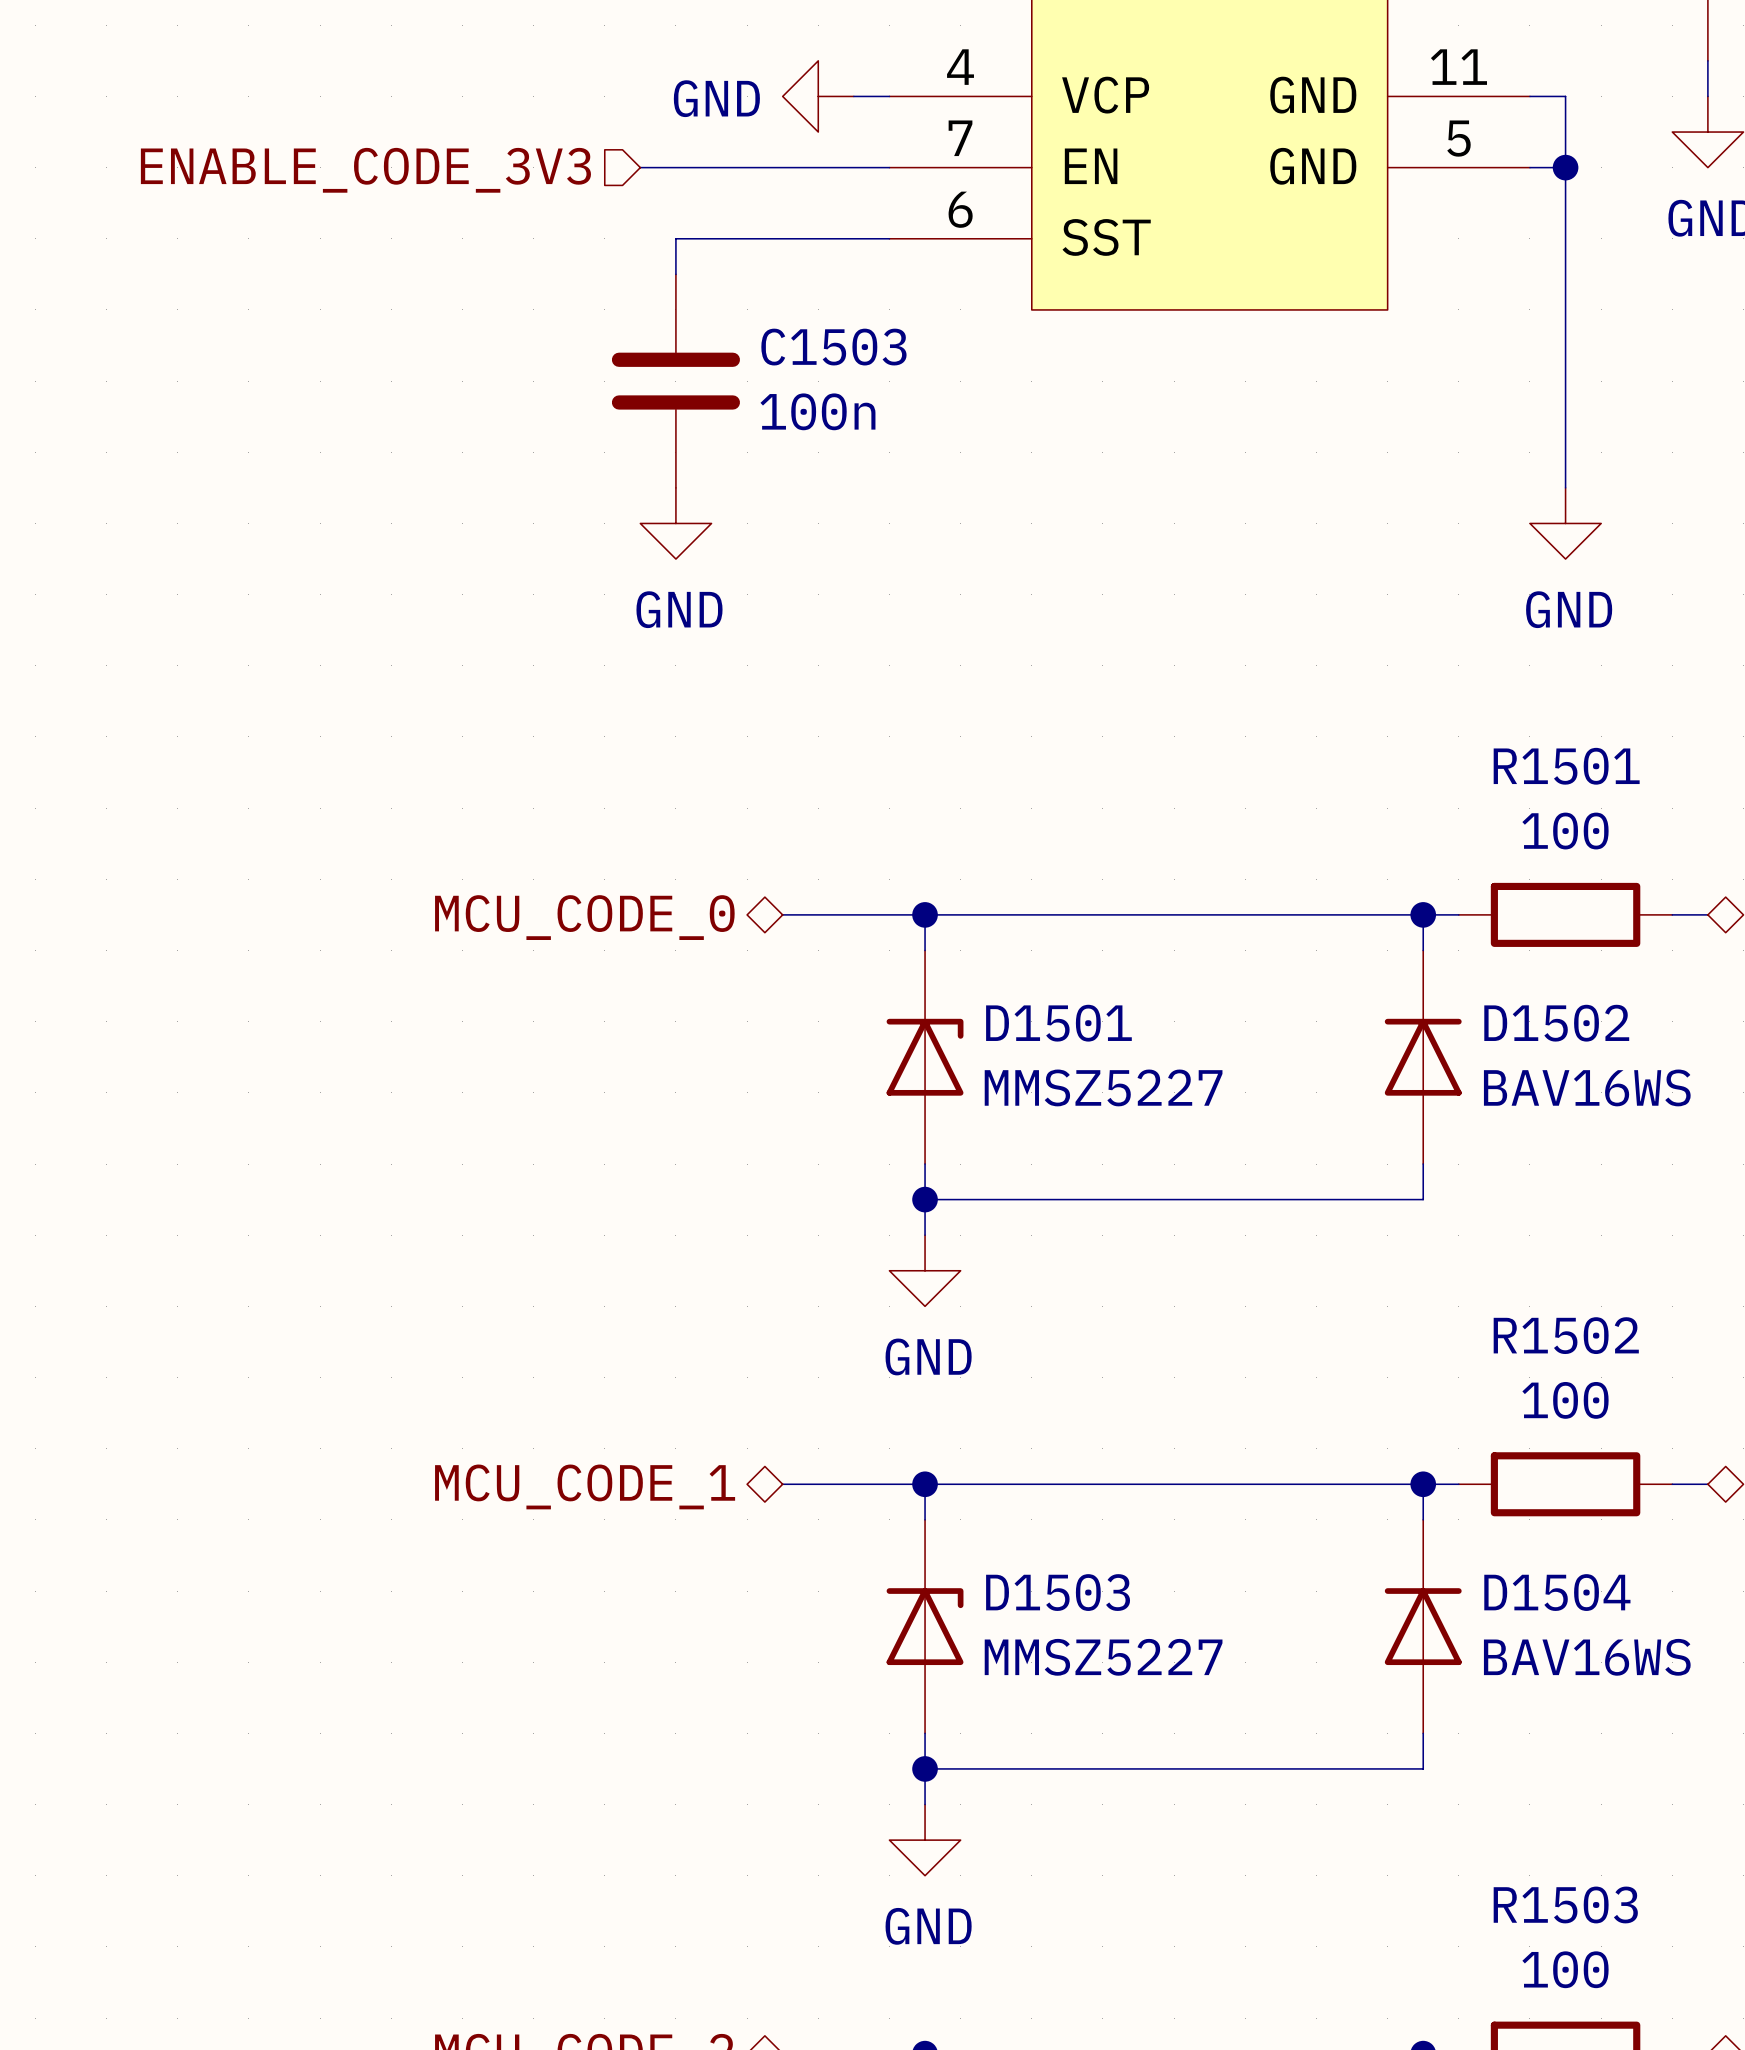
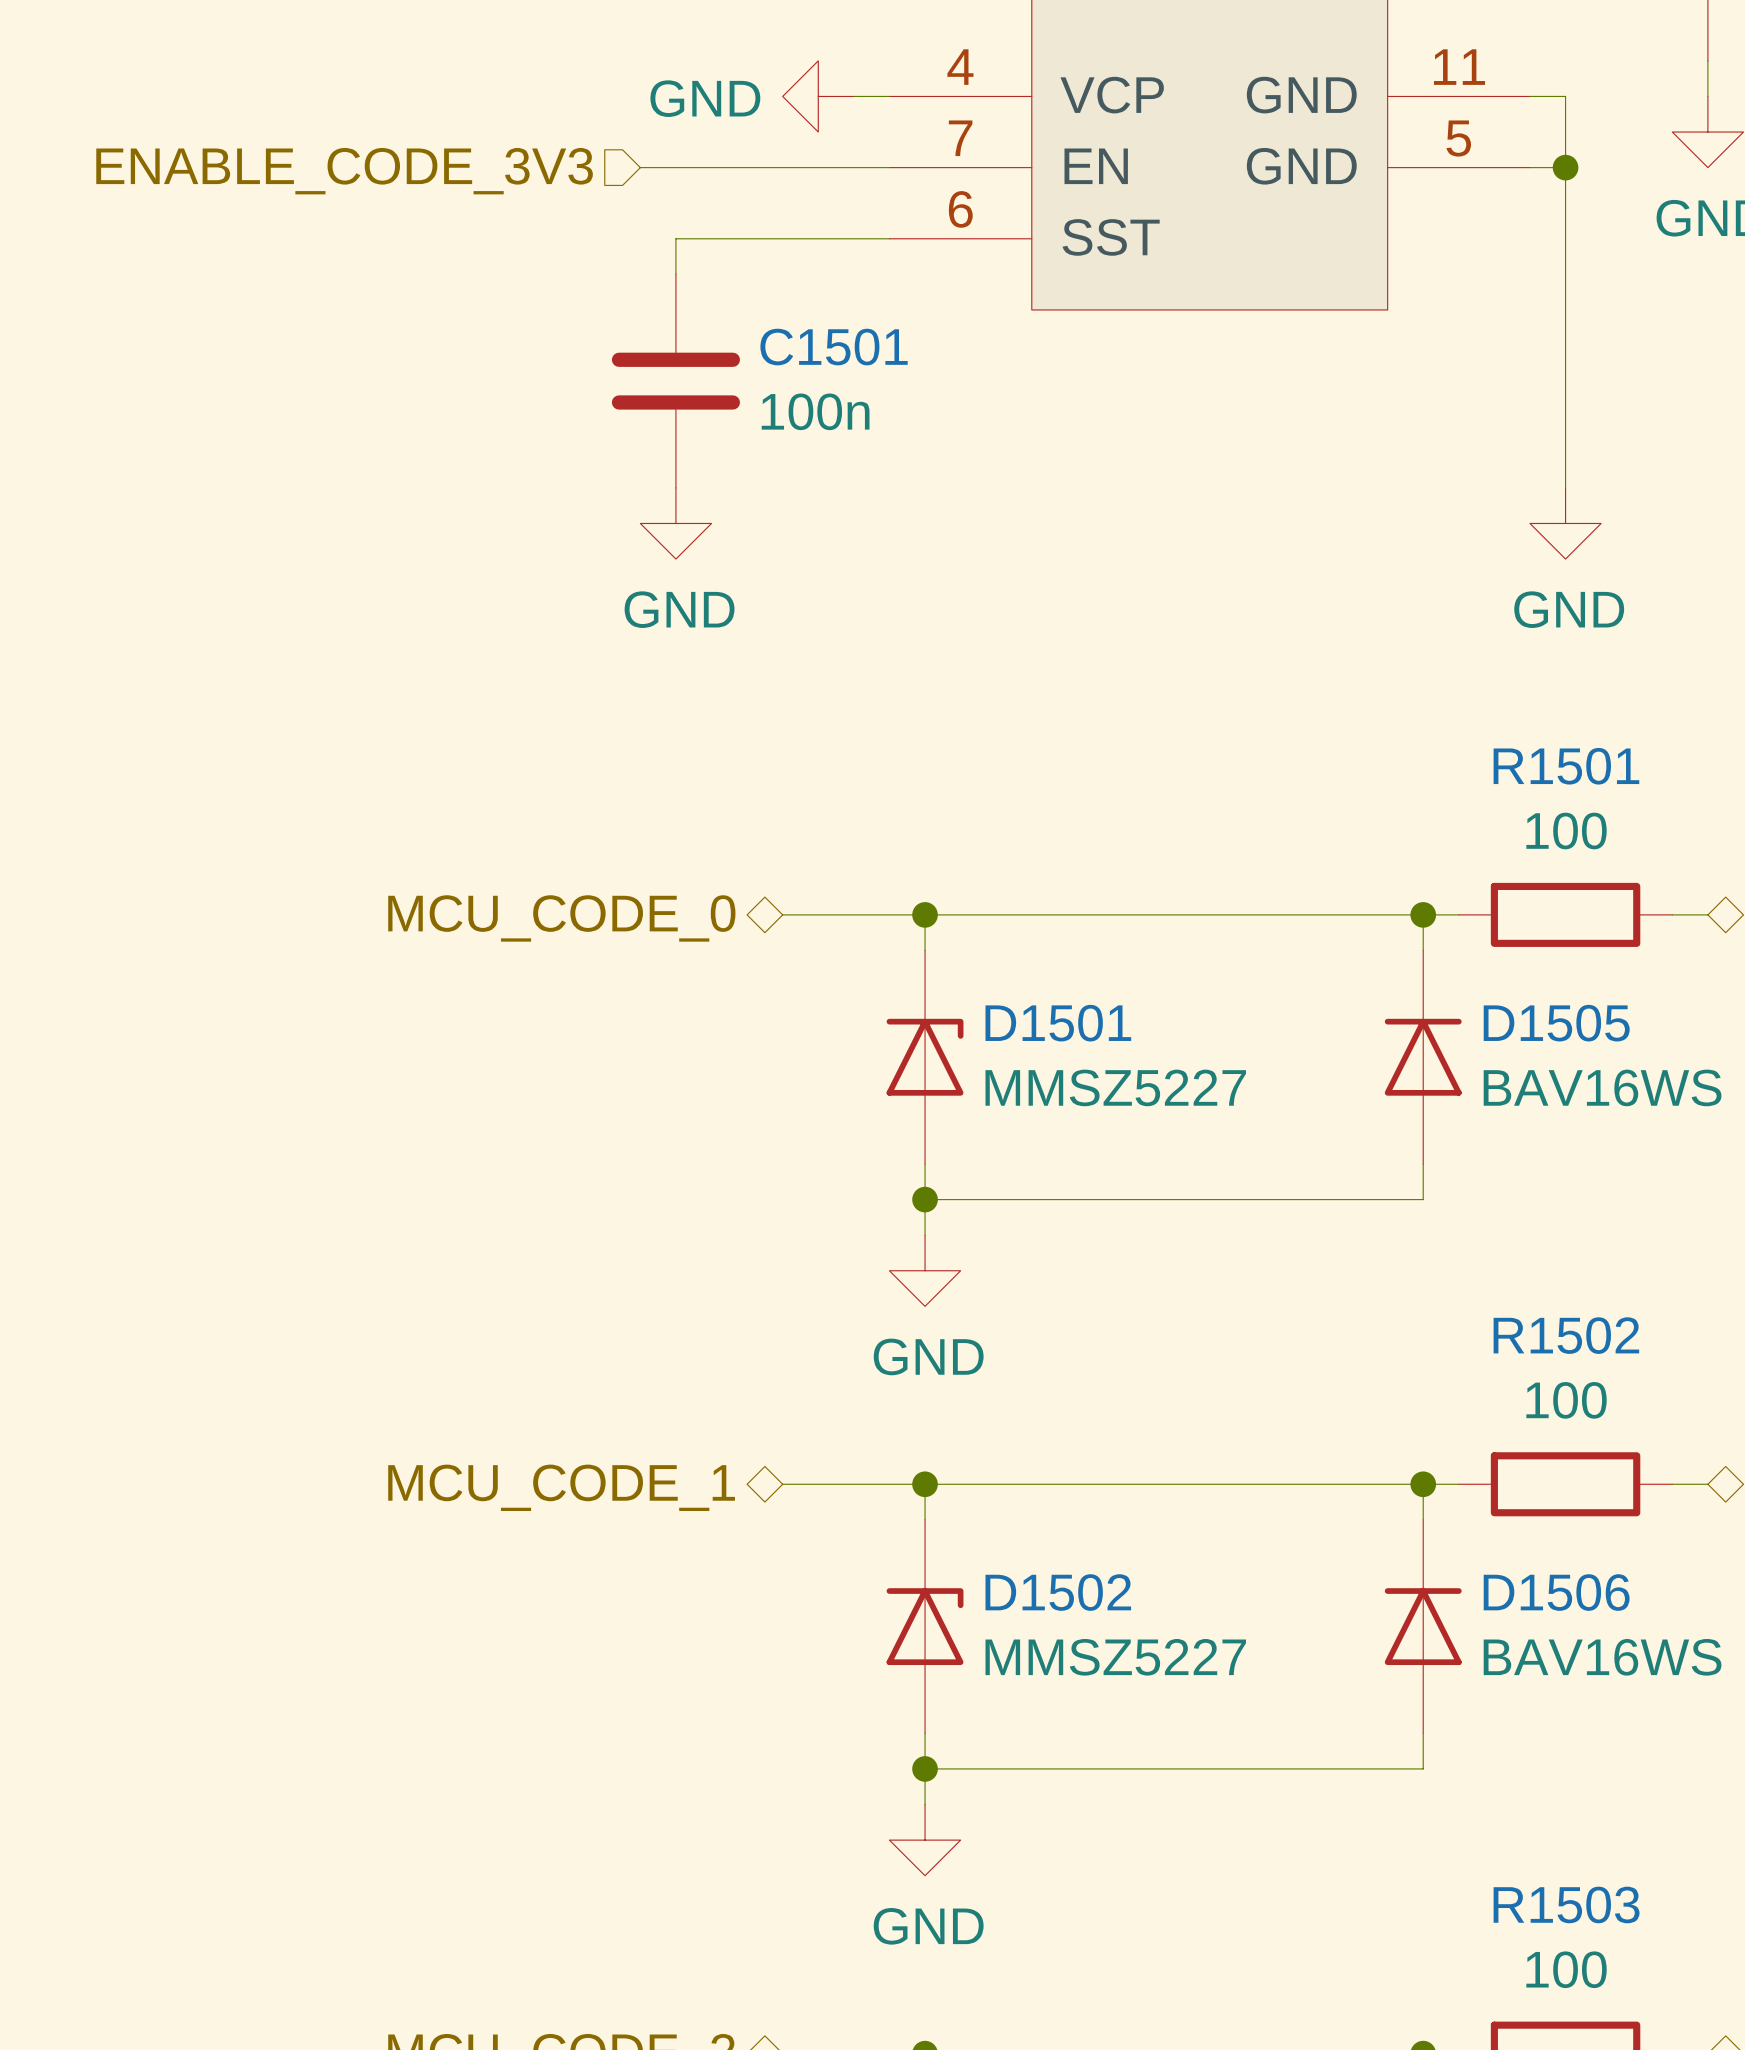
C1503 name: C1503 (833, 347) -> C1501 (834, 347)
D1502 name: D1502 (1556, 1023) -> D1505 (1556, 1023)
D1503 name: D1503 (1058, 1592) -> D1502 (1058, 1592)
D1504 name: D1504 (1557, 1592) -> D1506 (1556, 1592)

